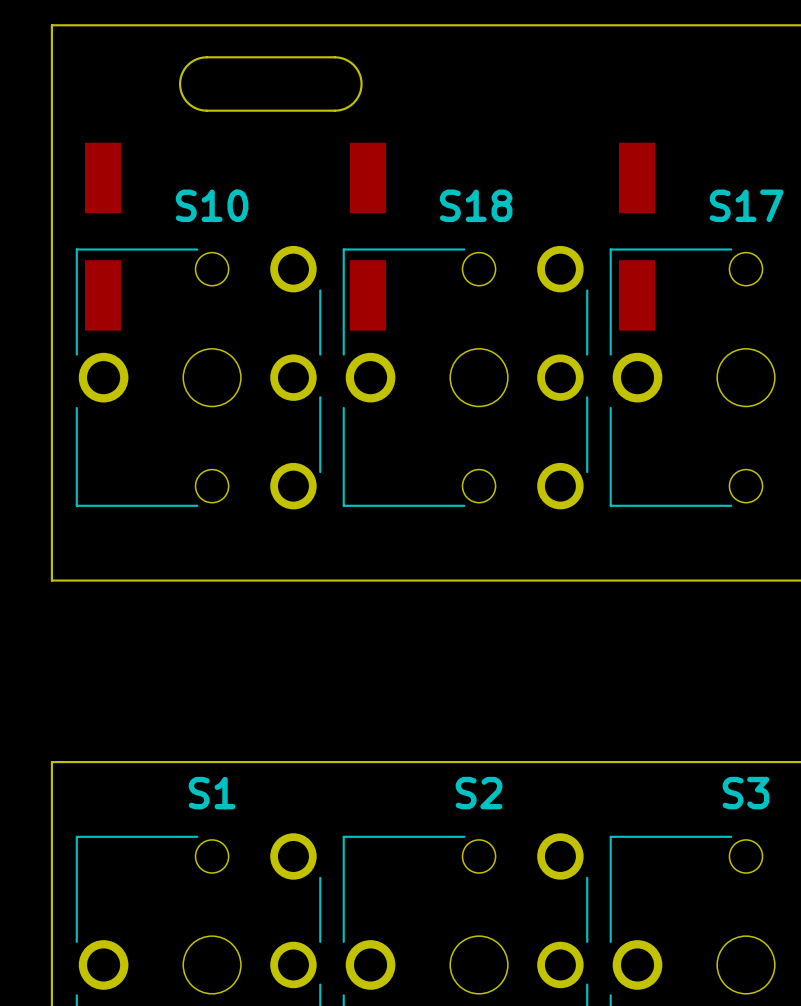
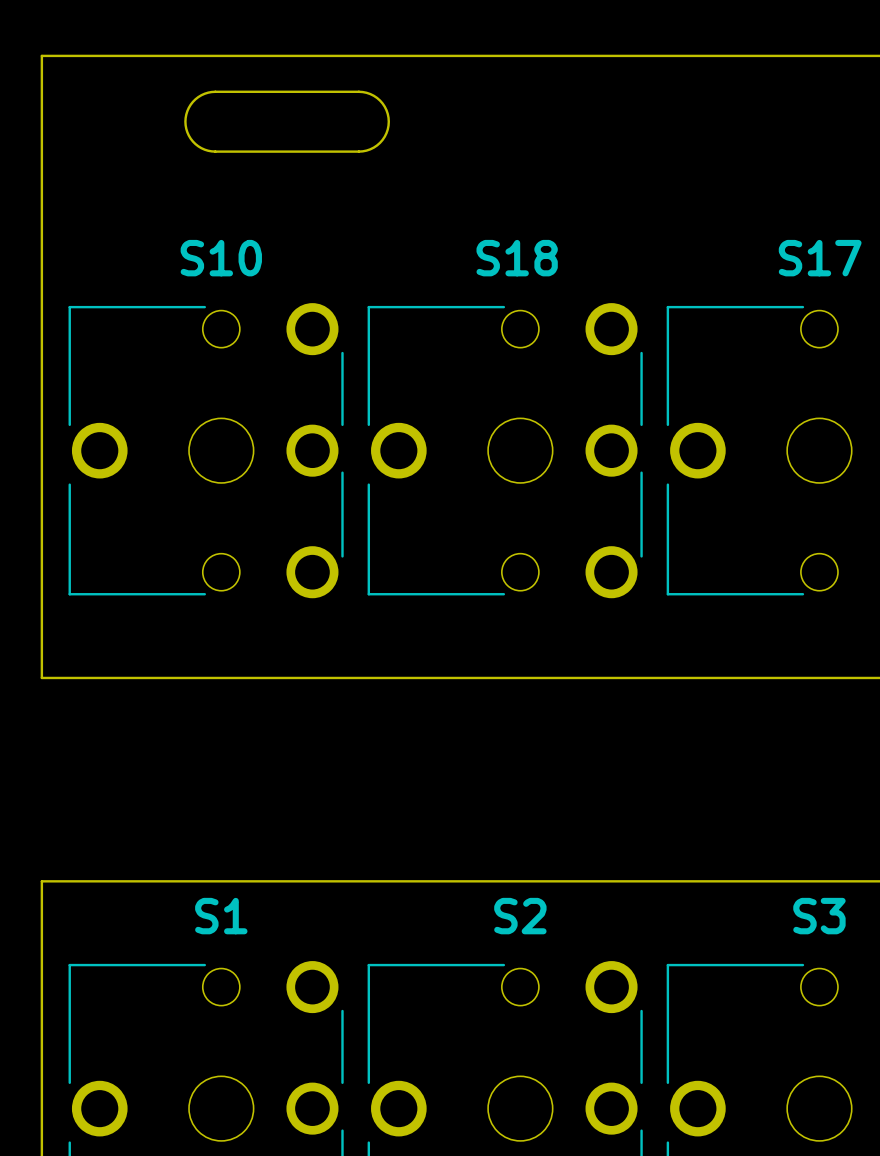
part: (103, 236) -> none
part: (367, 236) -> none
part: (637, 236) -> none

